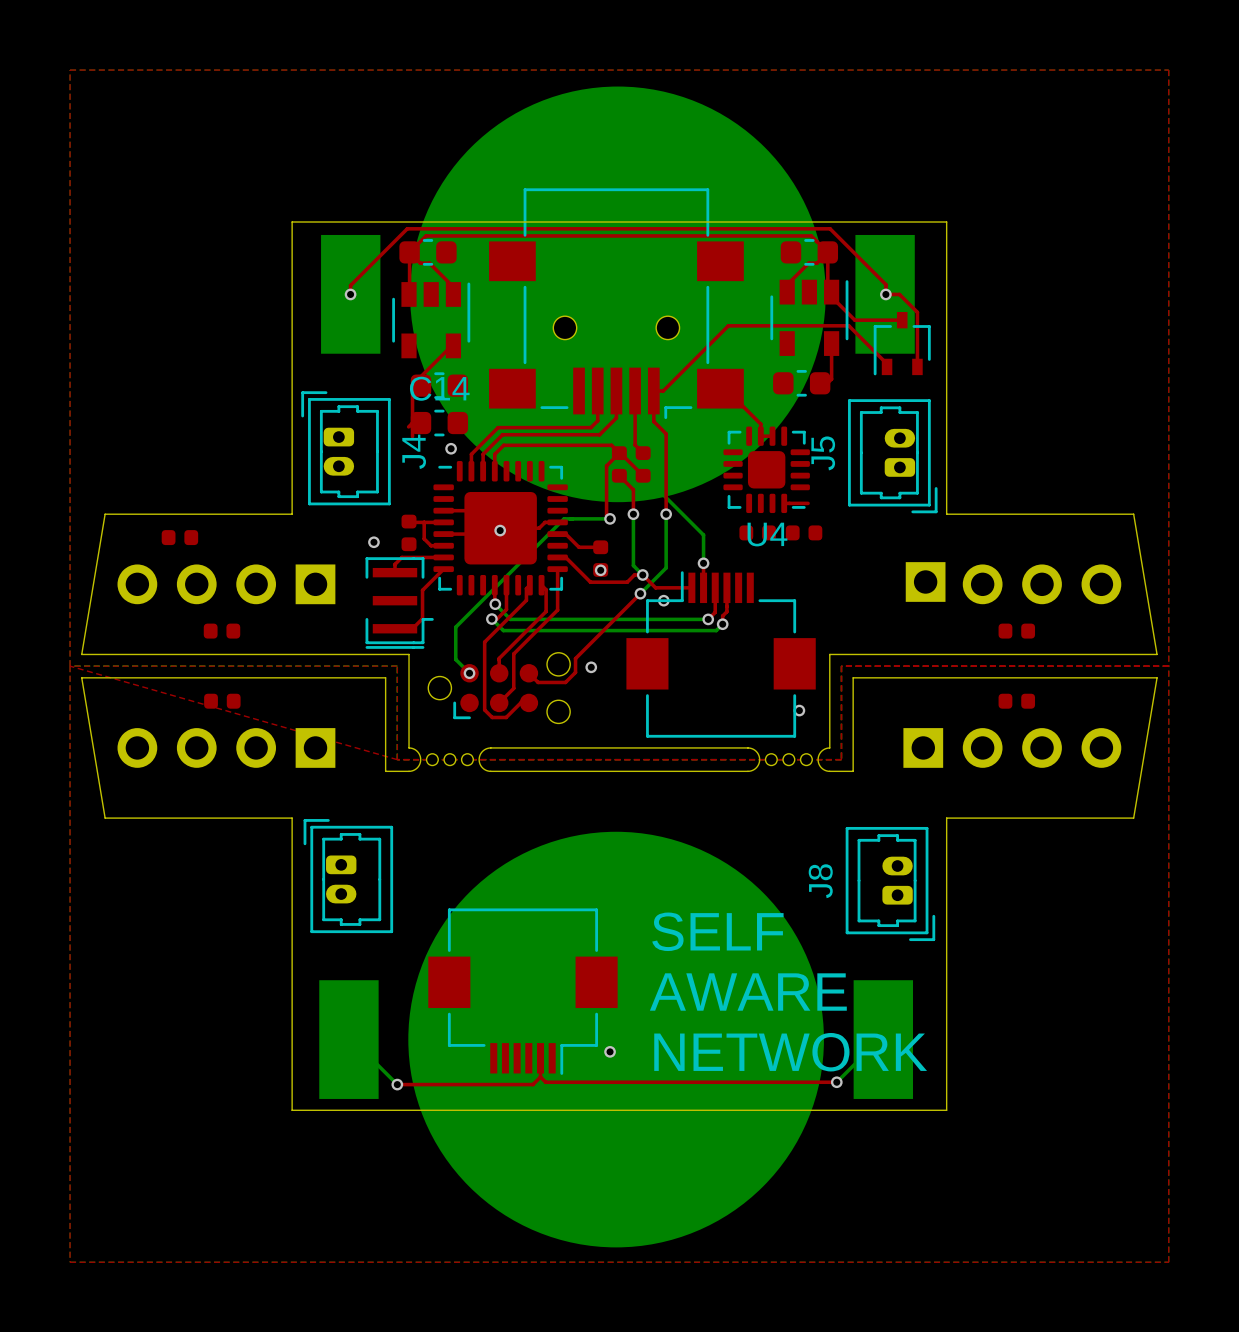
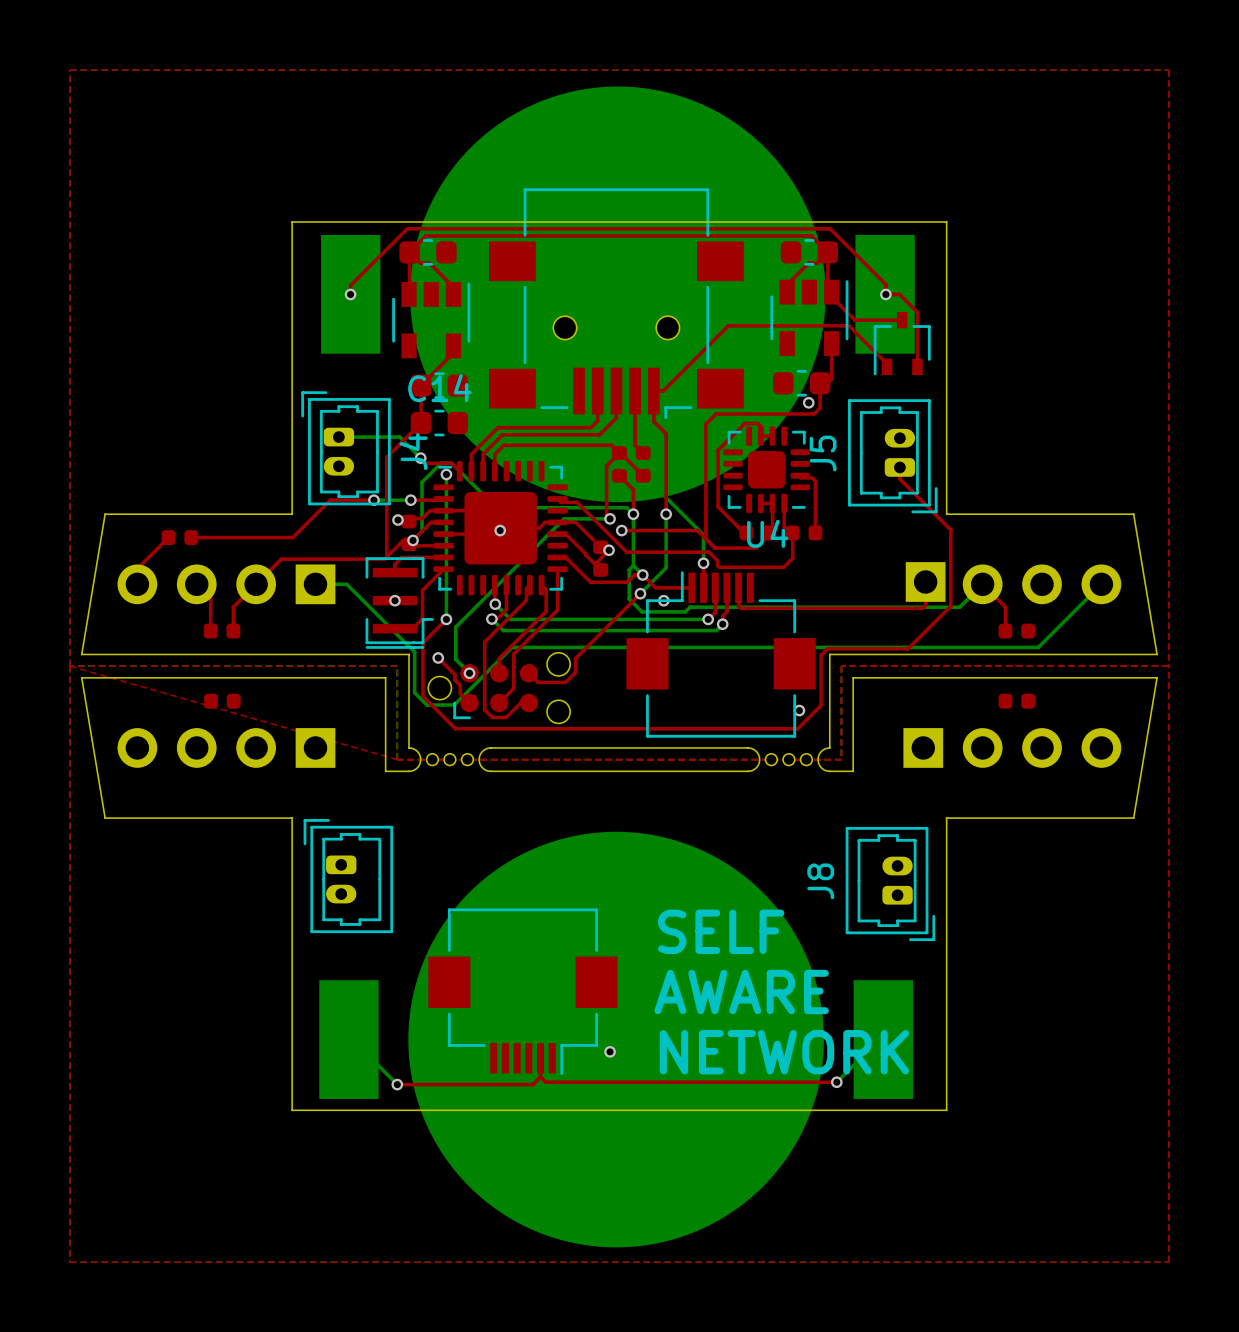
top track: (453, 345) (411, 385) (412, 436) -> (453, 345) (453, 353) (420, 385) (420, 423) (386, 457) (386, 556)
top track: none -> (820, 383) (820, 407) (814, 413) (716, 413) (705, 424) (705, 538)
top track: (720, 388) (725, 388) (760, 424) (760, 426) -> (746, 535) (718, 506) (718, 450) (744, 423) (757, 423) (760, 426)
via: none -> (808, 402)
top track: (412, 423) (408, 426) -> none
bottom track: none -> (338, 437) (399, 437) (420, 458)
via: (451, 448) -> none
top track: none -> (420, 458) (425, 463) (451, 463) (459, 471)
via: none -> (420, 458)
top track: none -> (899, 467) (899, 479) (950, 530) (950, 606) (908, 648) (827, 648) (821, 655) (821, 705) (797, 728) (455, 728) (422, 696) (422, 642) (446, 619)
bottom track: none -> (446, 474) (446, 619)
via: none -> (446, 474)
top track: none -> (800, 477) (812, 477) (815, 481) (815, 535)
top track: none -> (443, 499) (410, 500)
top track: none -> (557, 499) (560, 502) (577, 502) (626, 552) (708, 552) (717, 560) (719, 567) (783, 567) (792, 558) (792, 535) (784, 526) (784, 505)
top track: none -> (373, 500) (330, 500) (292, 537) (191, 537)
bottom track: none -> (373, 500) (410, 500)
via: none -> (373, 500)
via: none -> (410, 500)
top track: none -> (760, 503) (770, 503)
top track: (784, 503) (808, 503) -> none
top track: none -> (772, 505) (772, 531) (756, 548) (714, 548) (697, 530) (621, 530)
top track: none -> (443, 510) (430, 510) (422, 518) (399, 518) (397, 520)
bottom track: none -> (633, 514) (626, 507) (496, 507) (451, 463) (441, 463) (422, 482) (422, 531) (413, 540)
via: none -> (397, 520)
top track: (408, 521) (431, 522) -> (412, 540) (431, 522)
top track: (424, 522) (424, 538) (431, 545) -> (233, 631) (233, 607) (281, 559) (384, 559) (402, 541) (412, 541) (417, 545) (431, 545)
top track: none -> (557, 522) (575, 522) (593, 540)
via: none -> (621, 530)
top track: none -> (168, 537) (137, 568) (137, 584)
via: none -> (413, 540)
via: (373, 542) -> none
top track: (578, 547) (600, 547) -> (578, 547) (593, 562) (596, 562) (609, 550)
bottom track: none -> (633, 565) (629, 569) (629, 599) (642, 611) (685, 611) (690, 607) (959, 607) (982, 584)
via position: (600, 570) -> (609, 550)
top track: none -> (925, 581) (925, 605) (922, 608) (740, 608) (738, 606) (738, 587)
top track: none -> (196, 584) (210, 598) (210, 631)
bottom track: none -> (315, 584) (346, 584) (414, 652) (414, 692) (426, 705) (454, 705) (511, 647) (1038, 647) (1101, 584)
top track: none -> (982, 584) (1005, 607) (1005, 631)
via: none -> (394, 600)
via: none -> (446, 619)
top track: none -> (438, 657) (454, 674) (454, 680) (460, 685) (460, 693) (469, 702)
via: none -> (438, 657)
via: (591, 667) -> none

